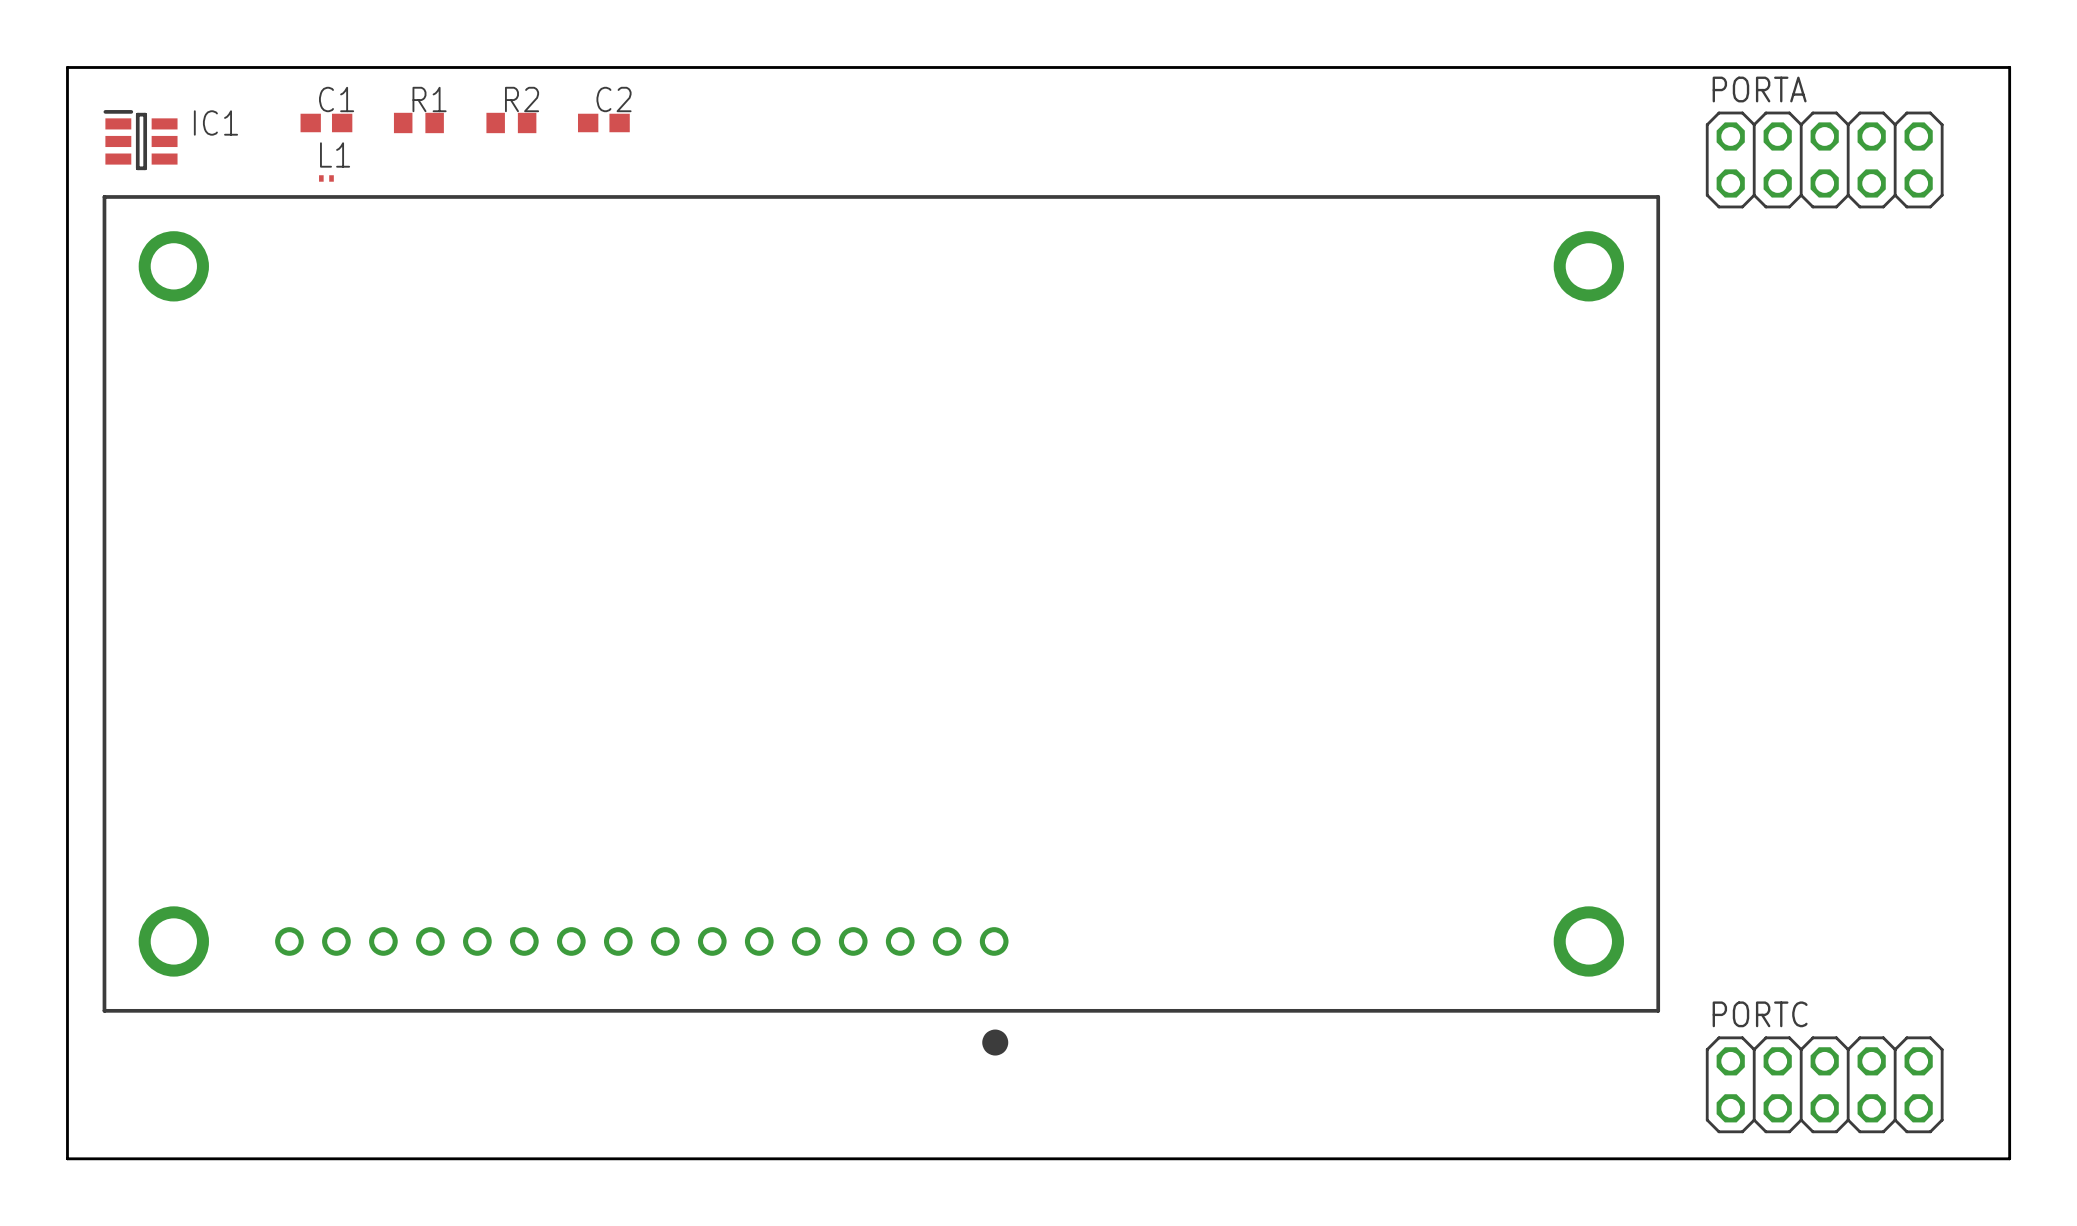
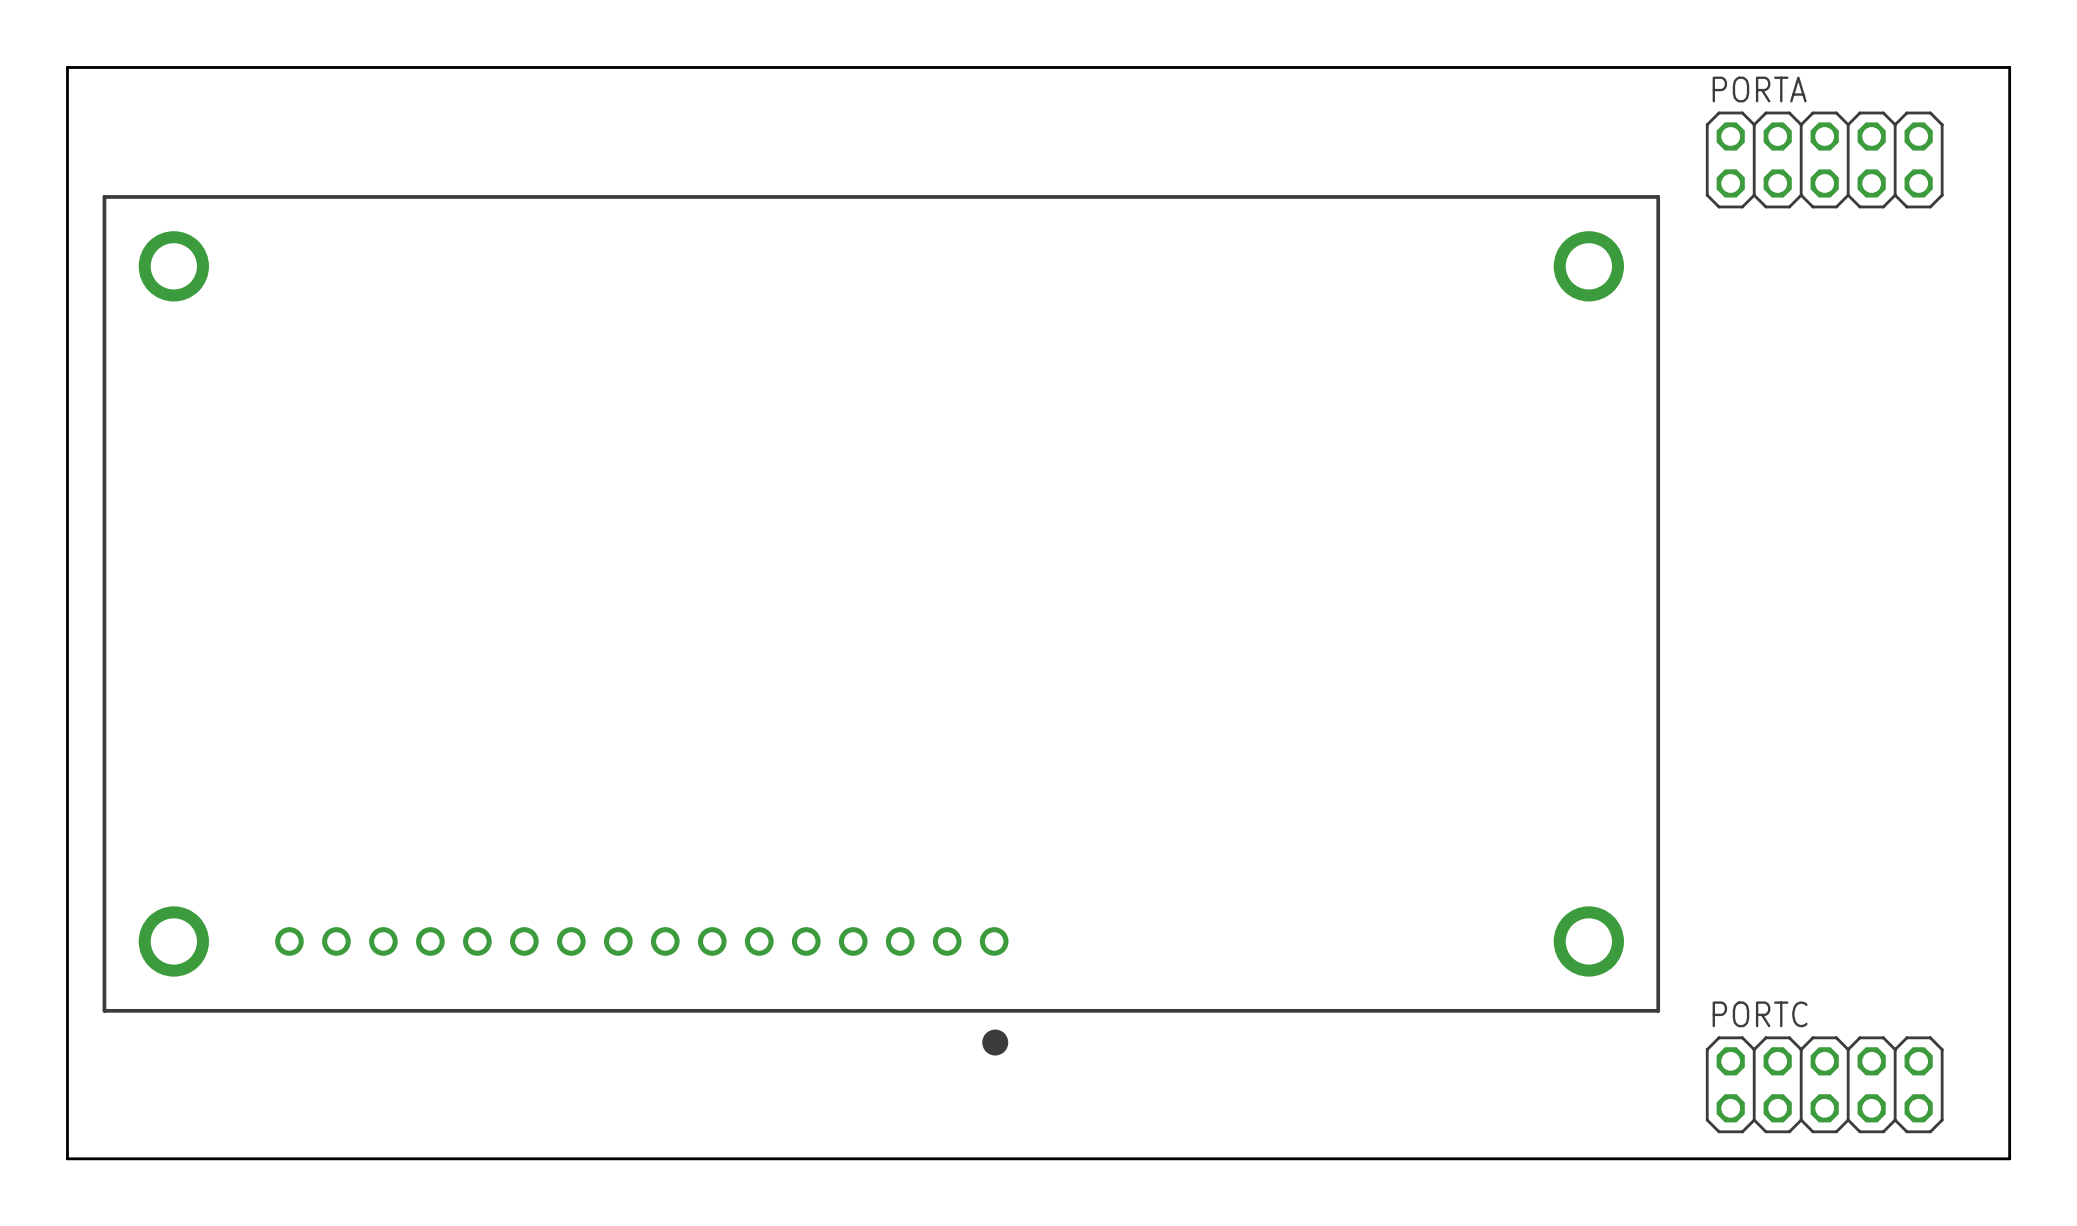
C1: (326, 122) -> none
R1: (418, 122) -> none
R2: (511, 122) -> none
C2: (603, 122) -> none
IC1: (140, 140) -> none
L1: (326, 178) -> none

